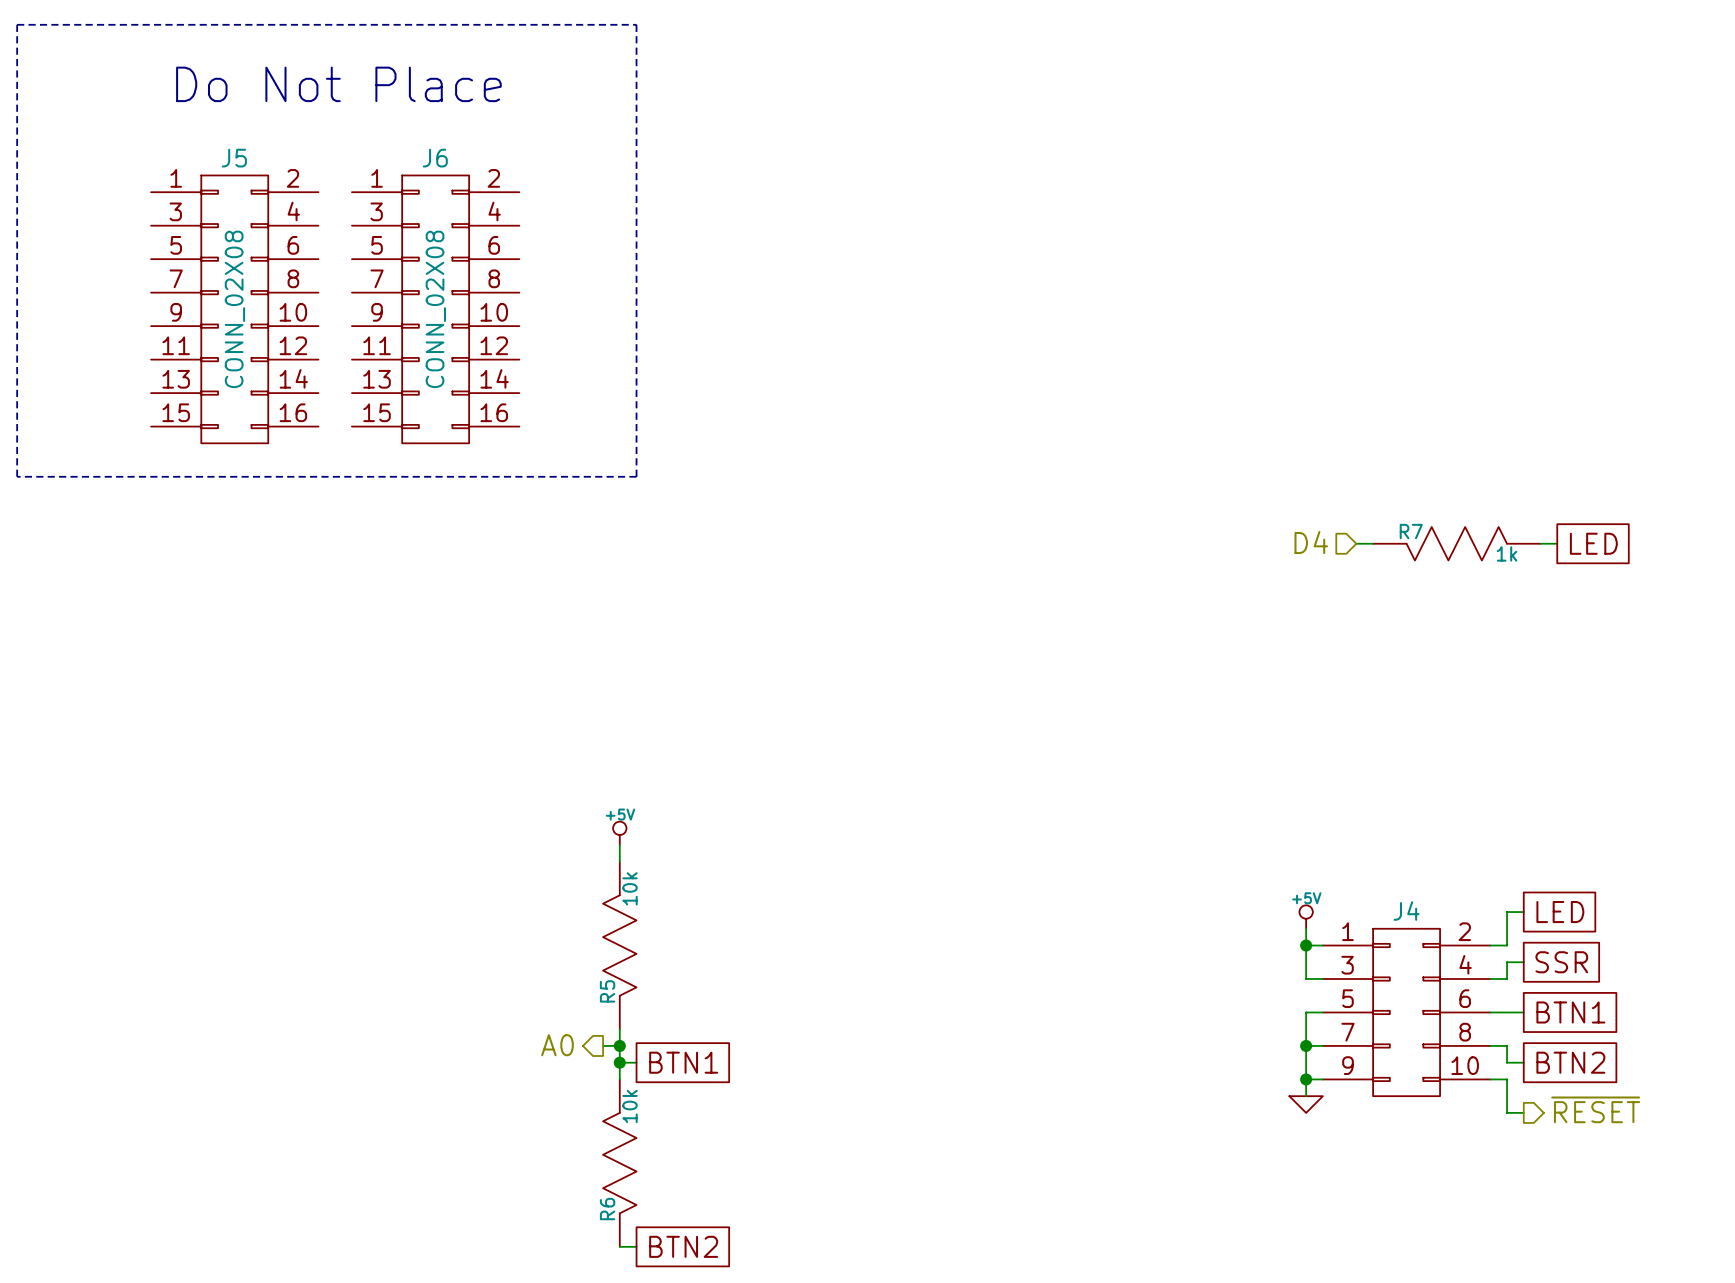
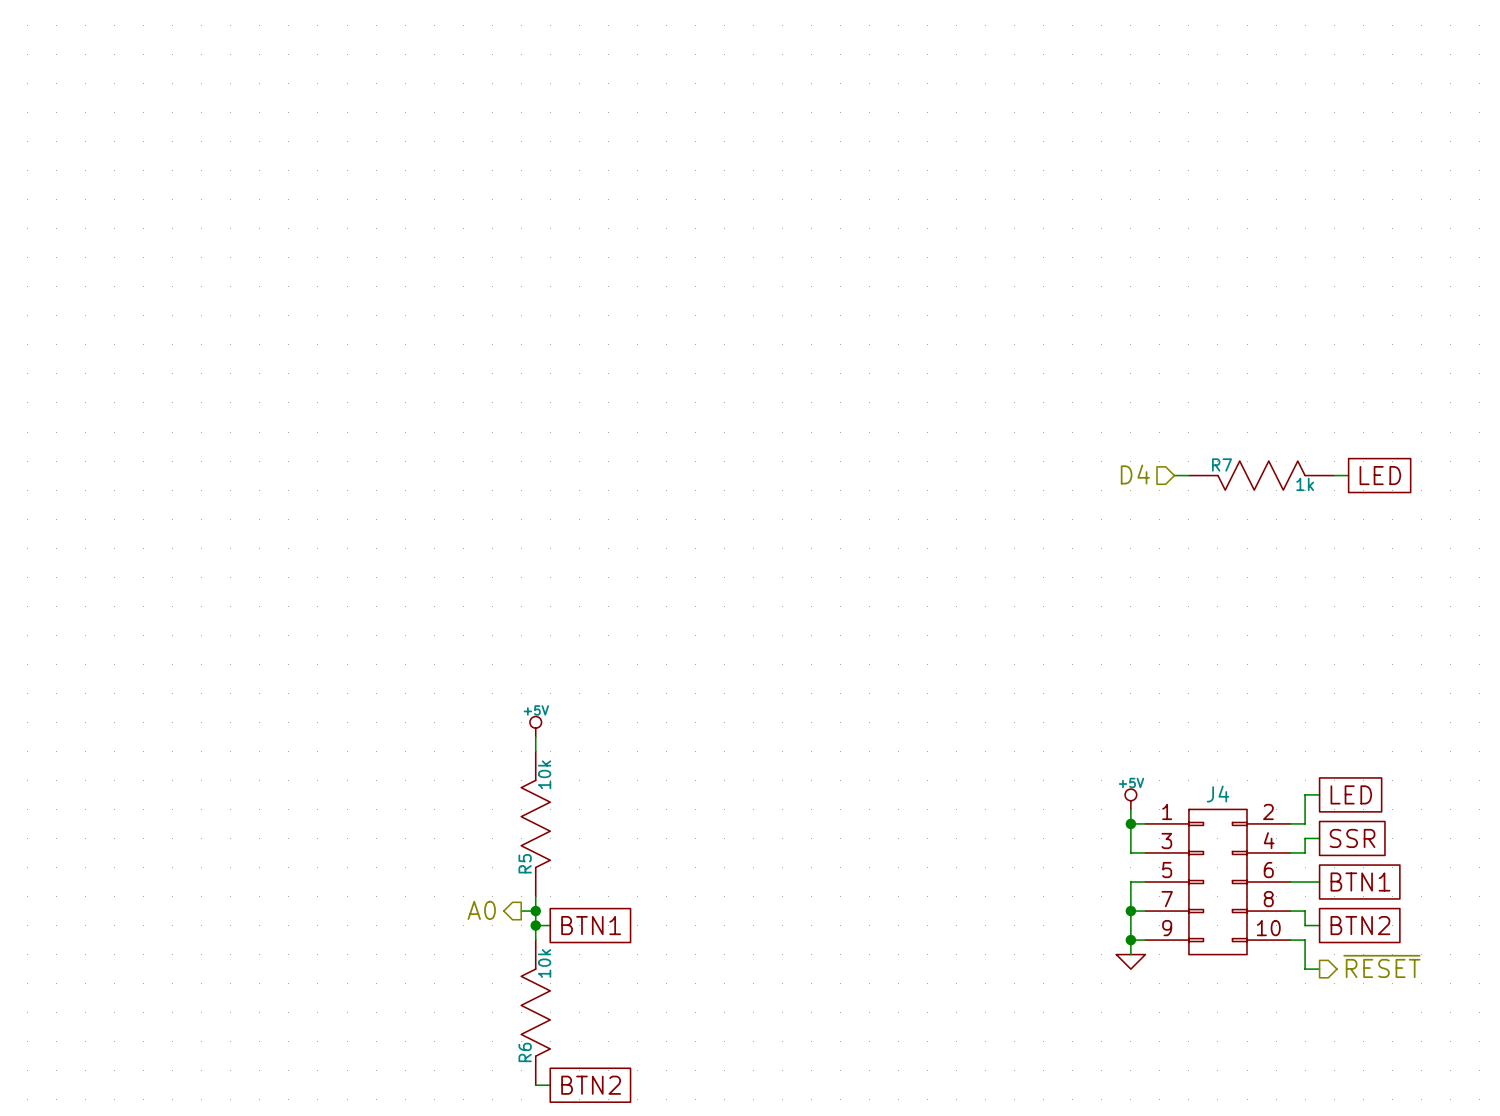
line: (17, 24) (636, 24) (636, 476) (17, 476) (17, 24) -> none
text: Do Not Place (338, 84) -> none
J5: CONN_02X08 (234, 309) -> none
J6: CONN_02X08 (435, 309) -> none

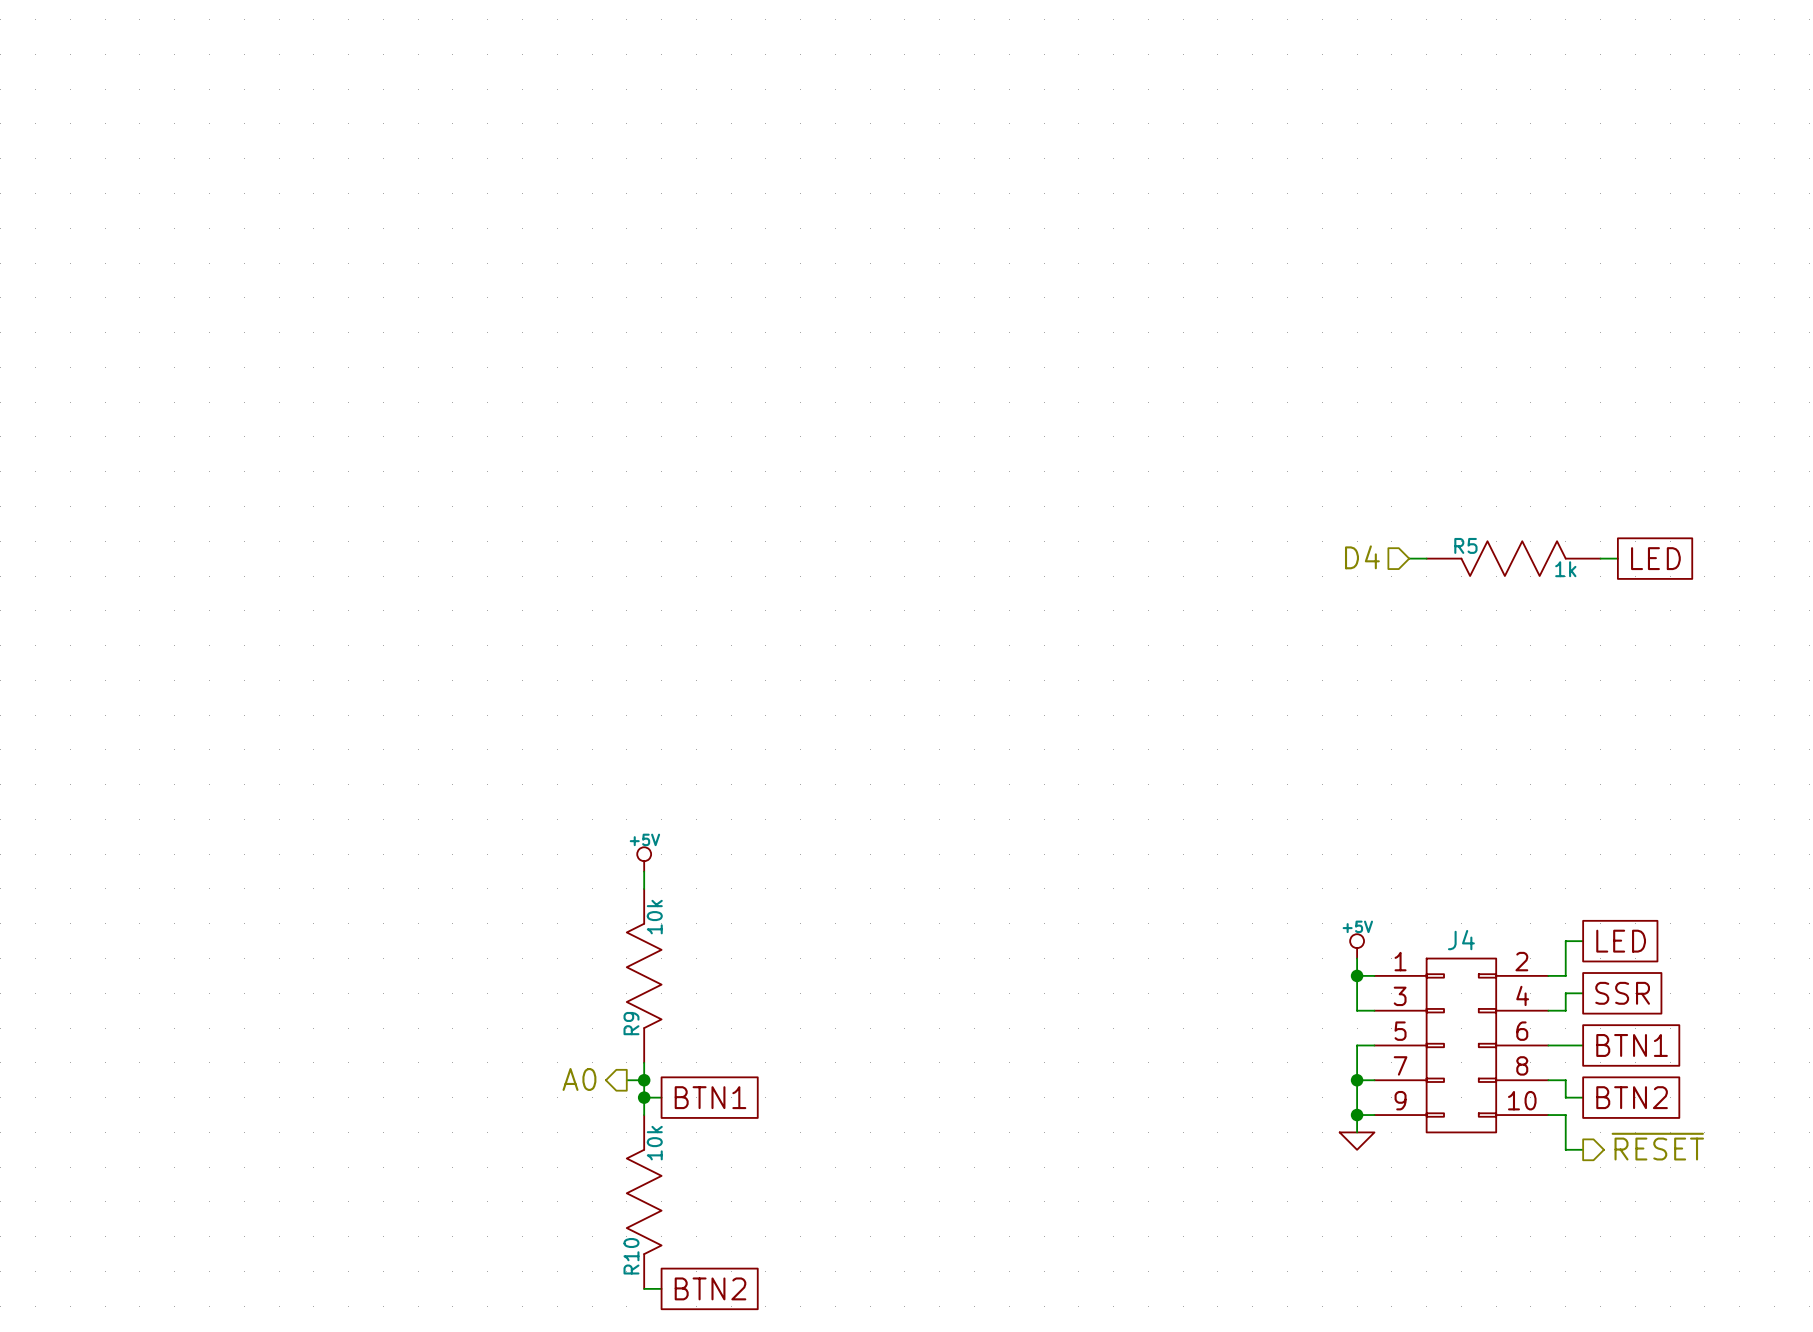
R7 name: R7 (1222, 464) -> R5 (1465, 545)
R5 name: R5 (525, 863) -> R9 (631, 1023)
R6 name: R6 (525, 1052) -> R10 (631, 1256)

